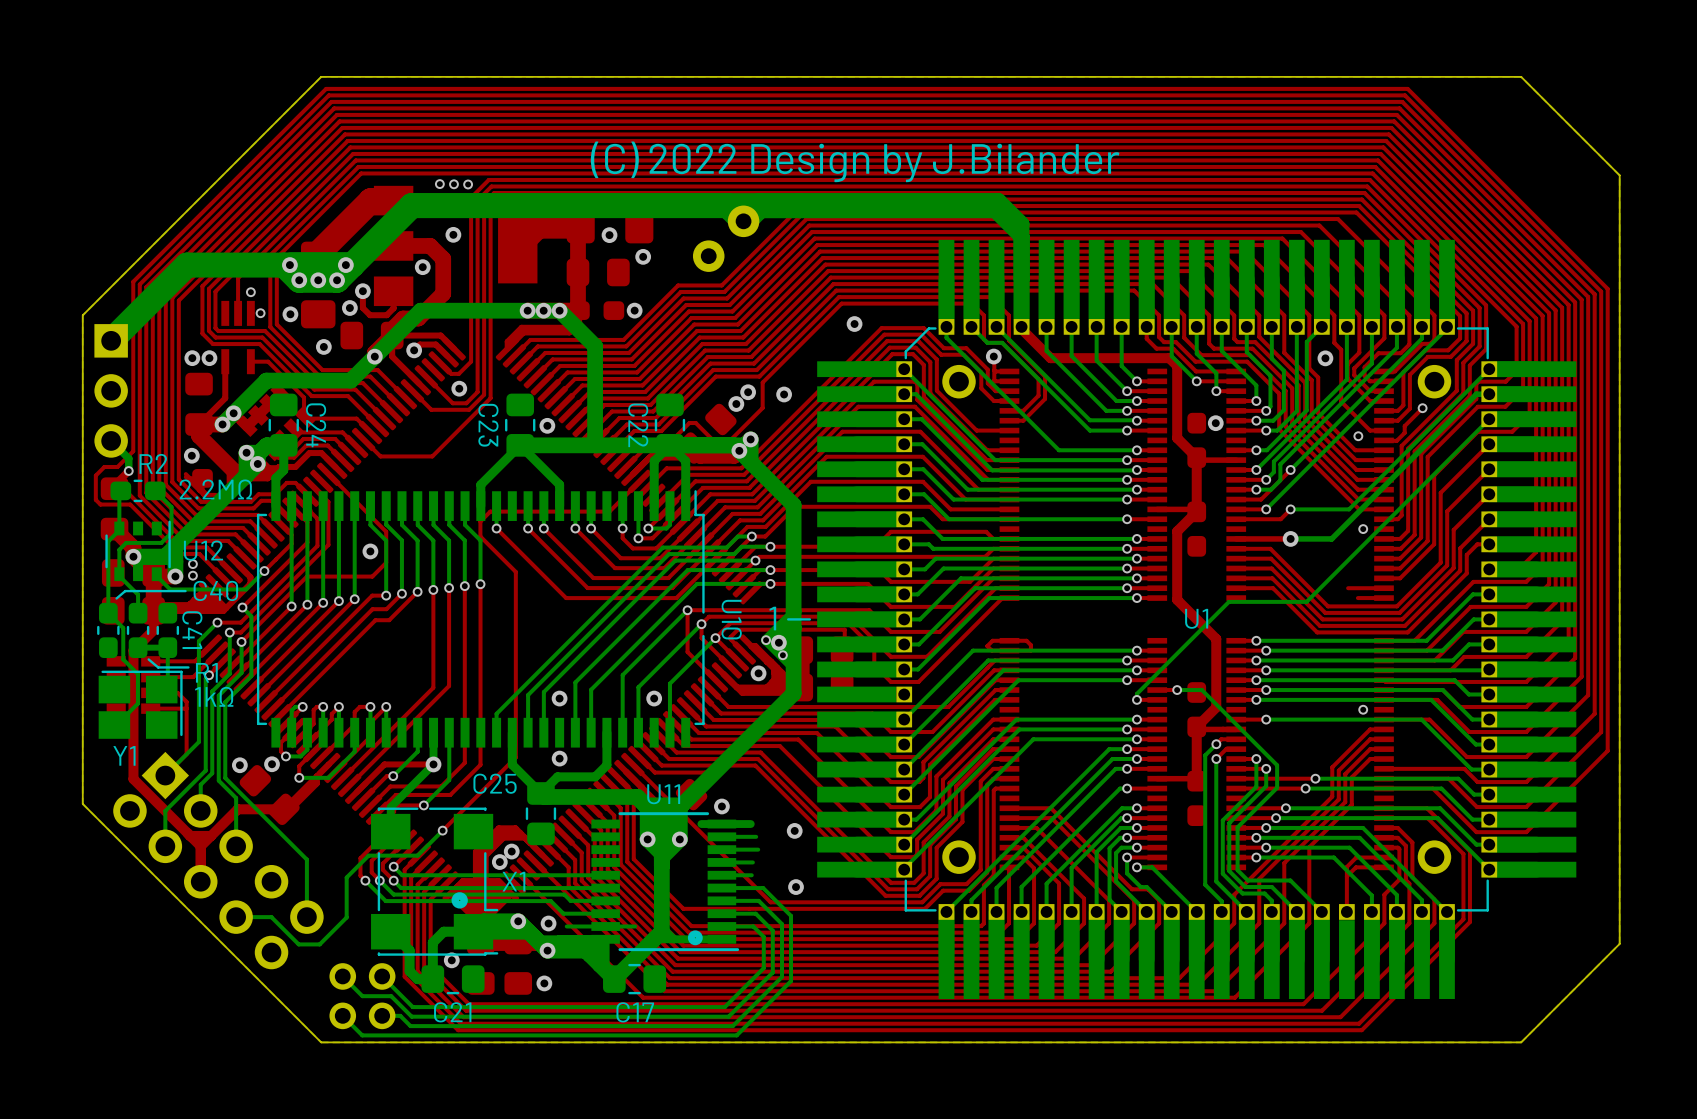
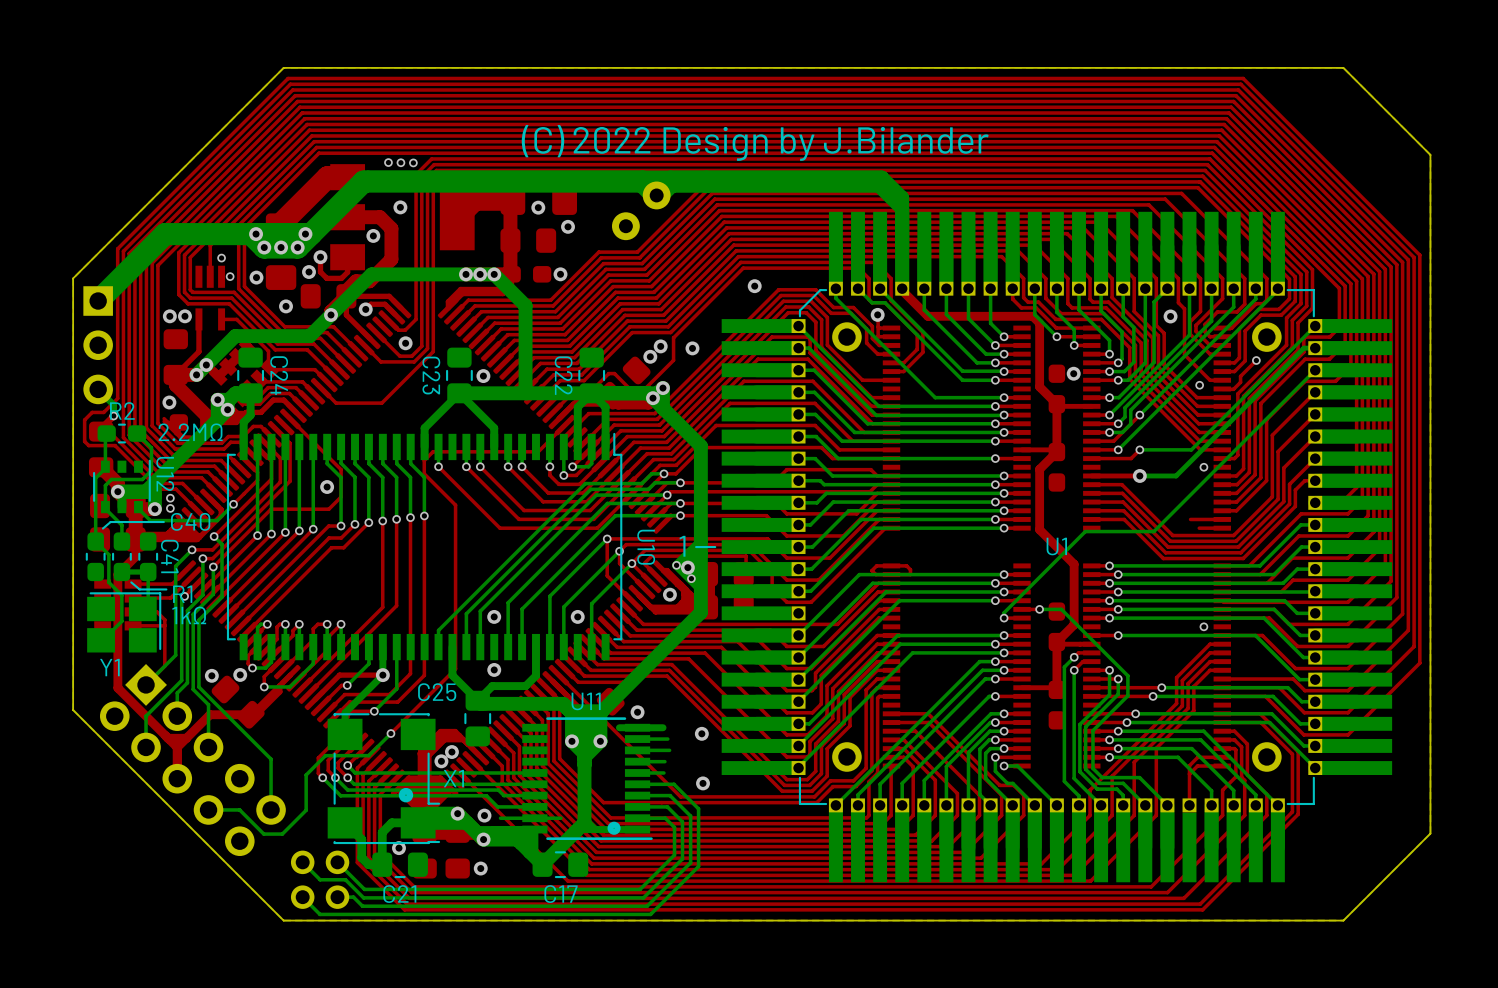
R2 name position: R2 (153, 463) -> R2 (122, 410)
U10 footprint: [256, 490, 705, 748] -> [226, 432, 623, 661]
U12 name rotation: 0° (203, 550) -> 90° clockwise (165, 474)

